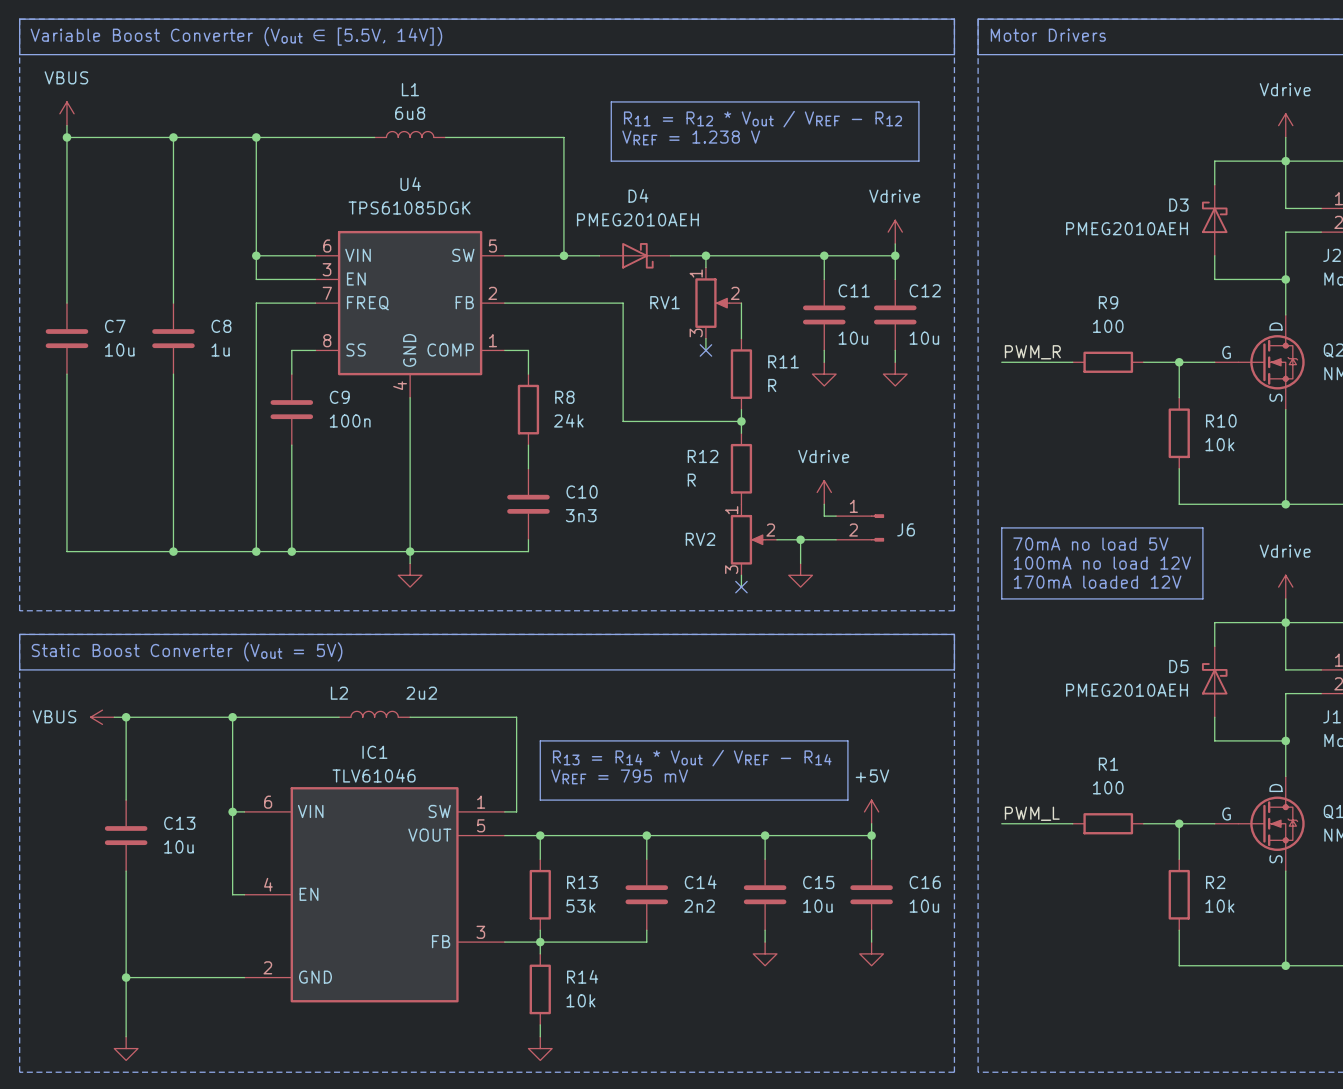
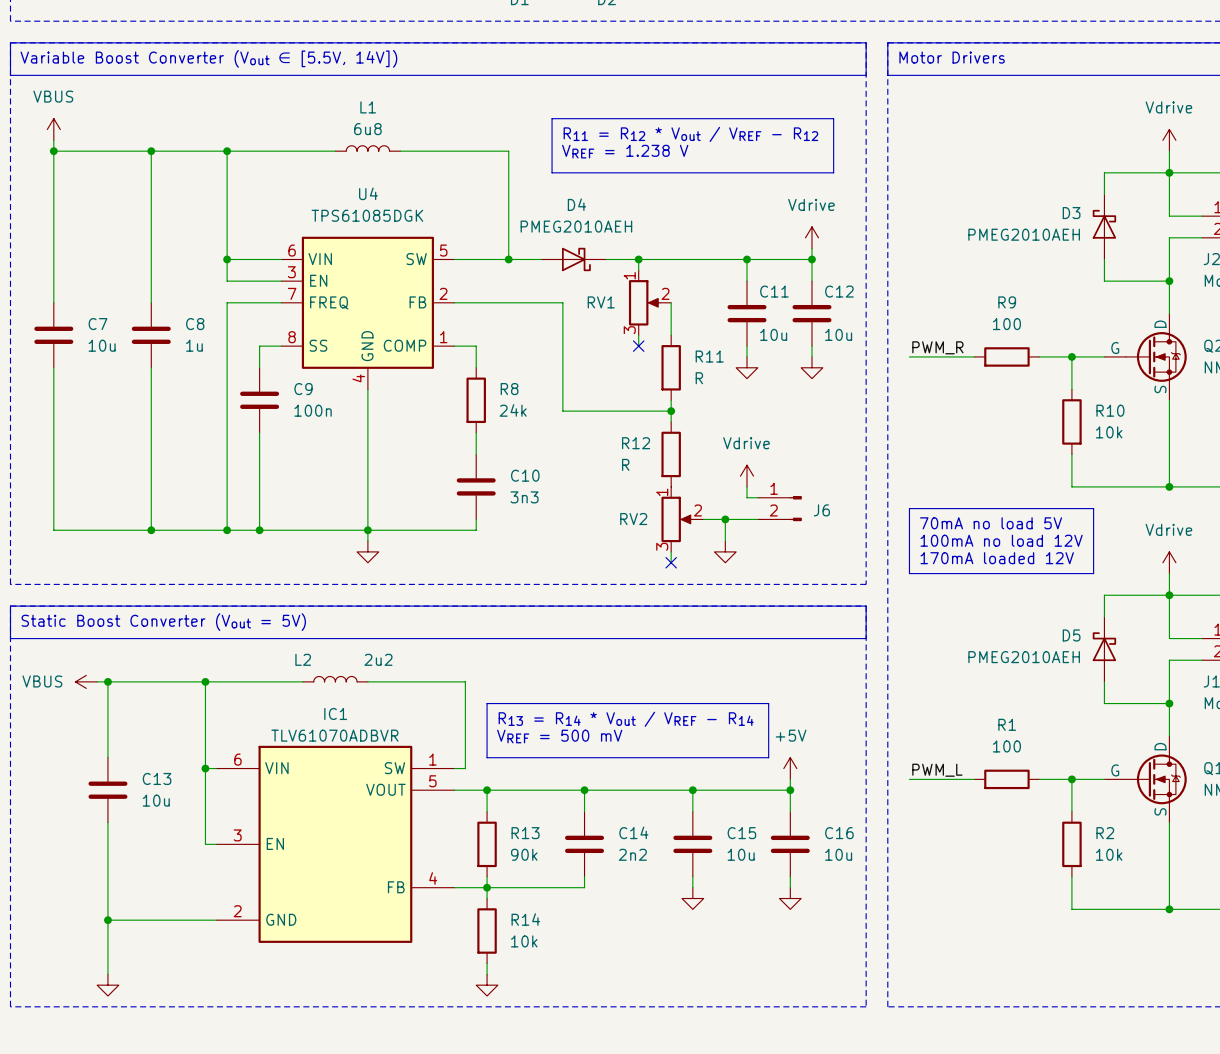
IC1 value: TLV61046 (374, 775) -> TLV61070ADBVR (334, 735)
text: VREF = 795 mV (619, 776) -> VREF = 500 mV (559, 736)
IC1 pin number: 4 (268, 884) -> 3 (237, 835)
R13 value: 53k (580, 906) -> 90k (524, 854)
IC1 pin number: 3 (480, 932) -> 4 (433, 878)

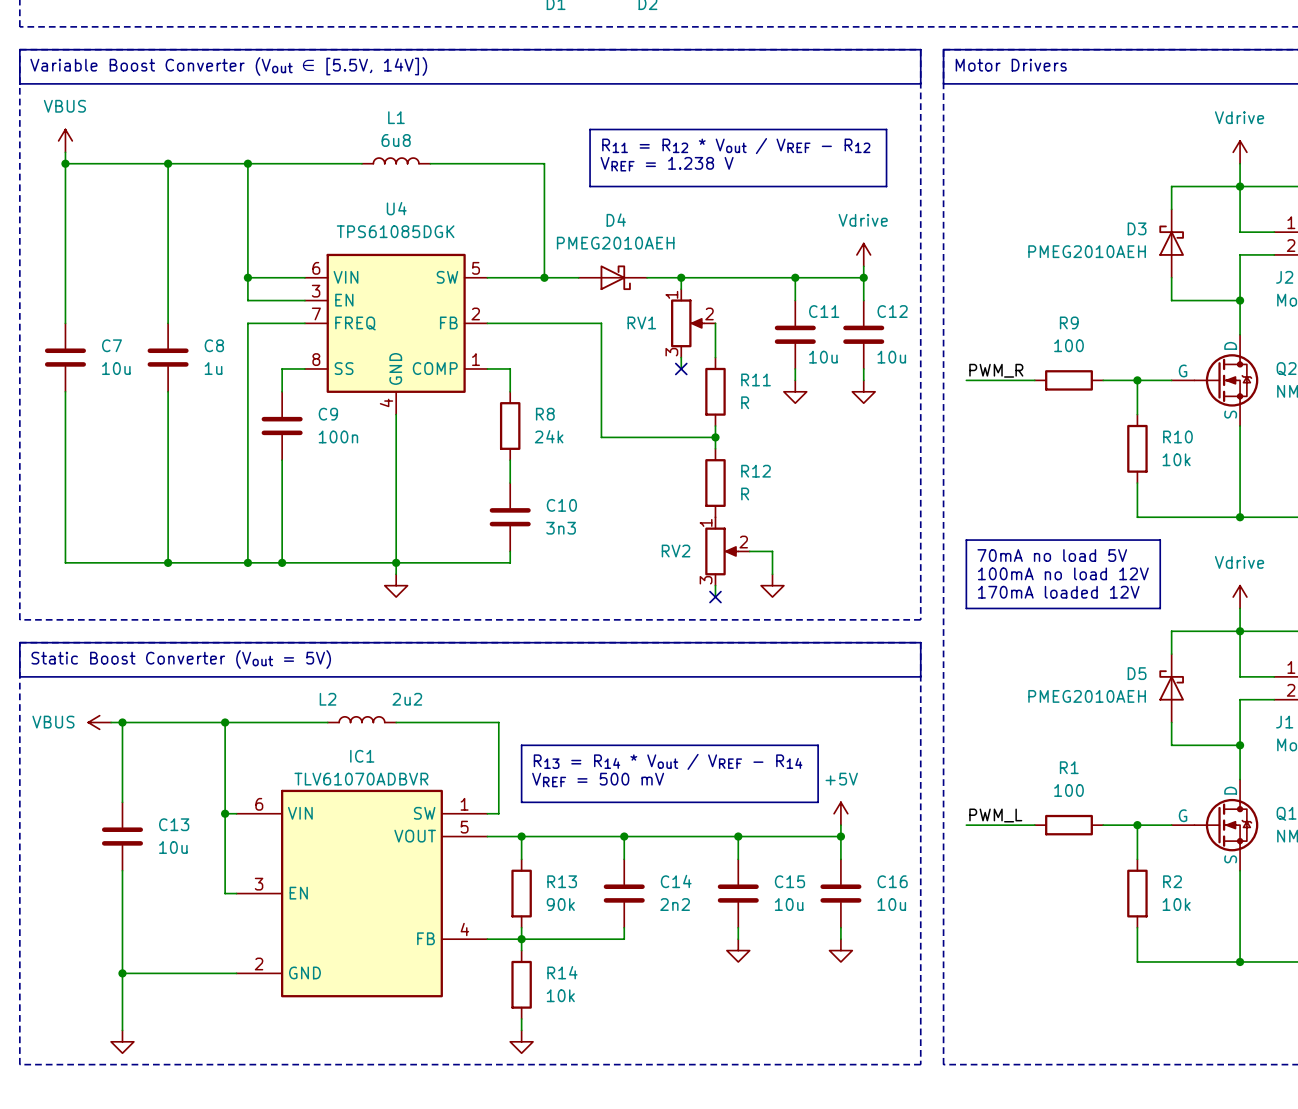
R12 name position: R12 (636, 443) -> R12 (756, 471)
R12 value position: R (625, 464) -> R (745, 494)
power symbol: Vdrive (747, 476) -> none
wire: (747, 486) (747, 497) (757, 497) -> none
J6: (779, 508) -> none
wire: (725, 519) (757, 519) -> none
junction: (725, 519) -> none

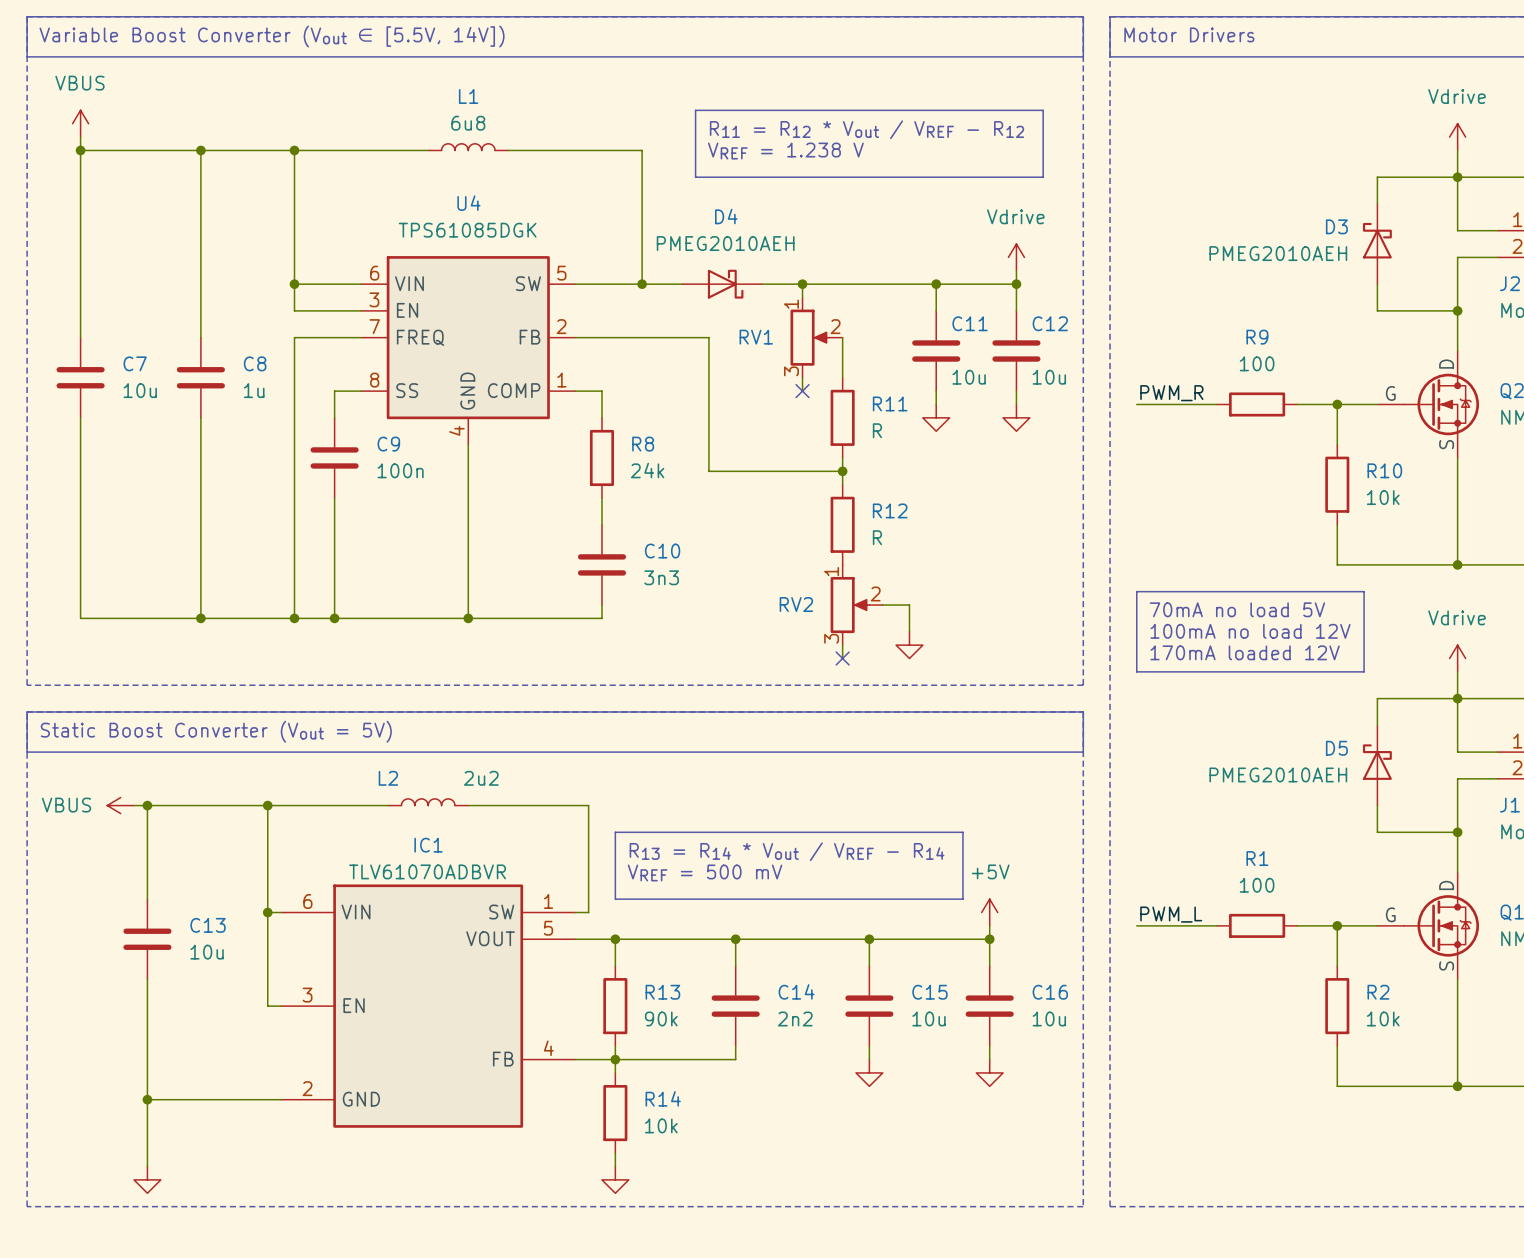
wire: (396, 562) (396, 574) -> none
power symbol: (396, 585) -> none

